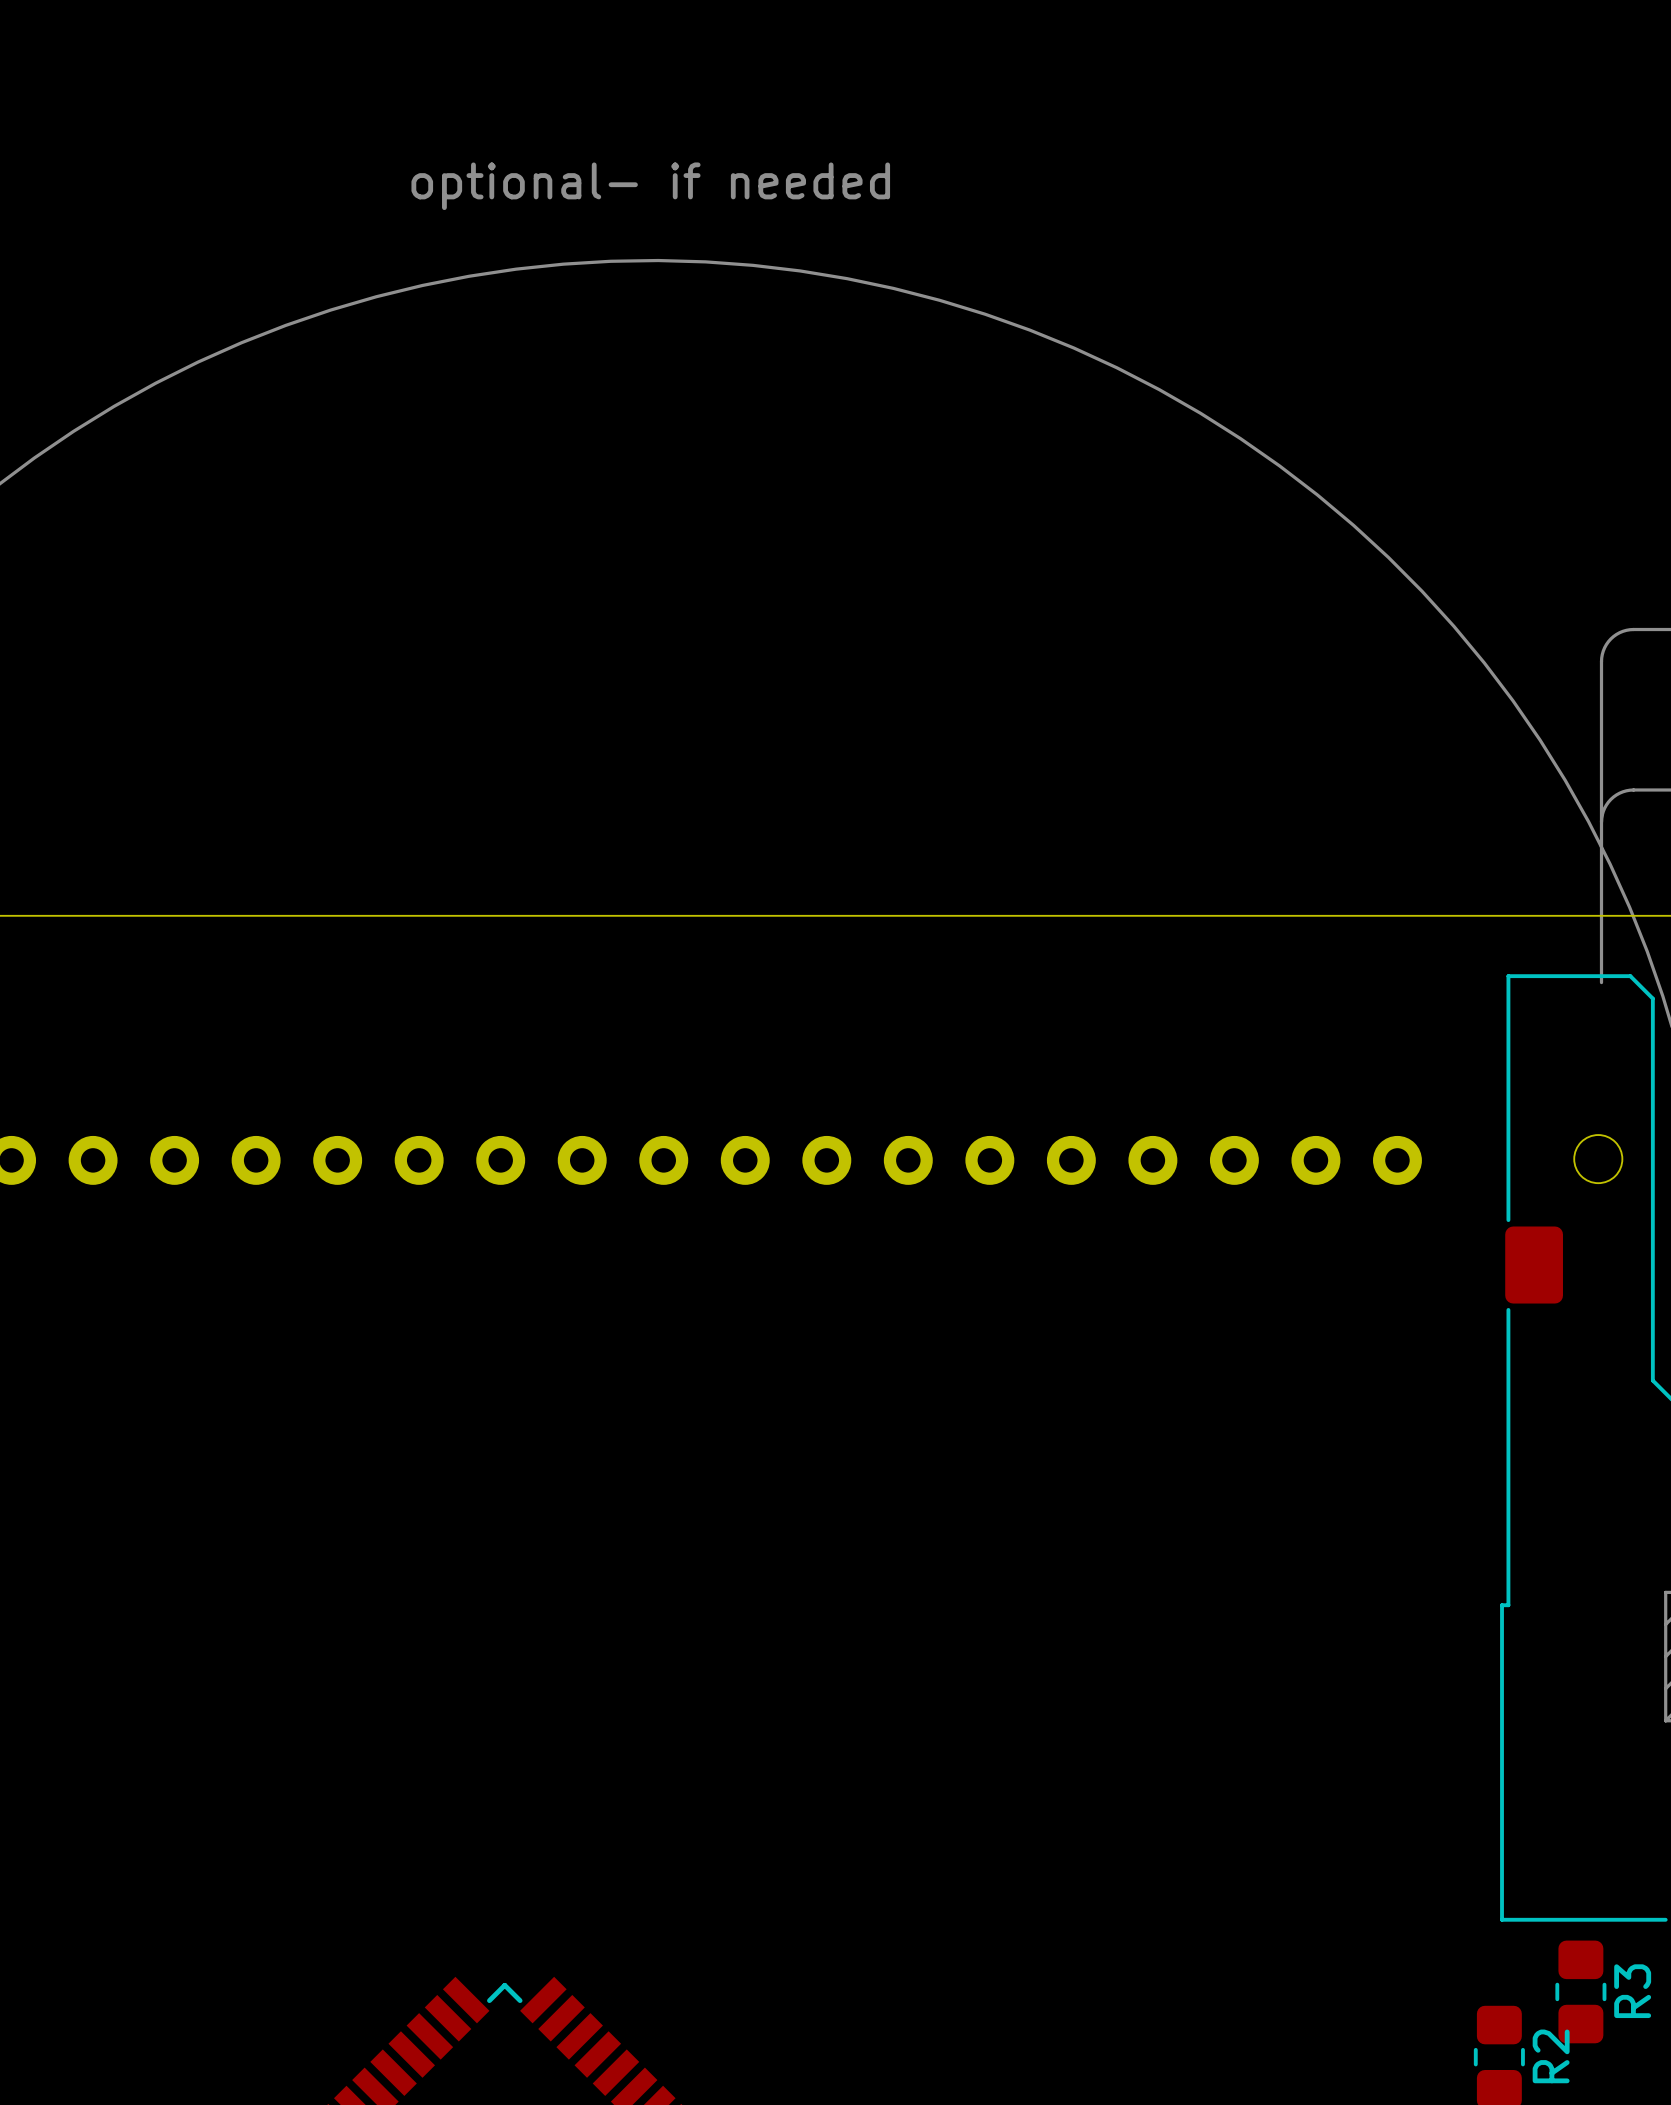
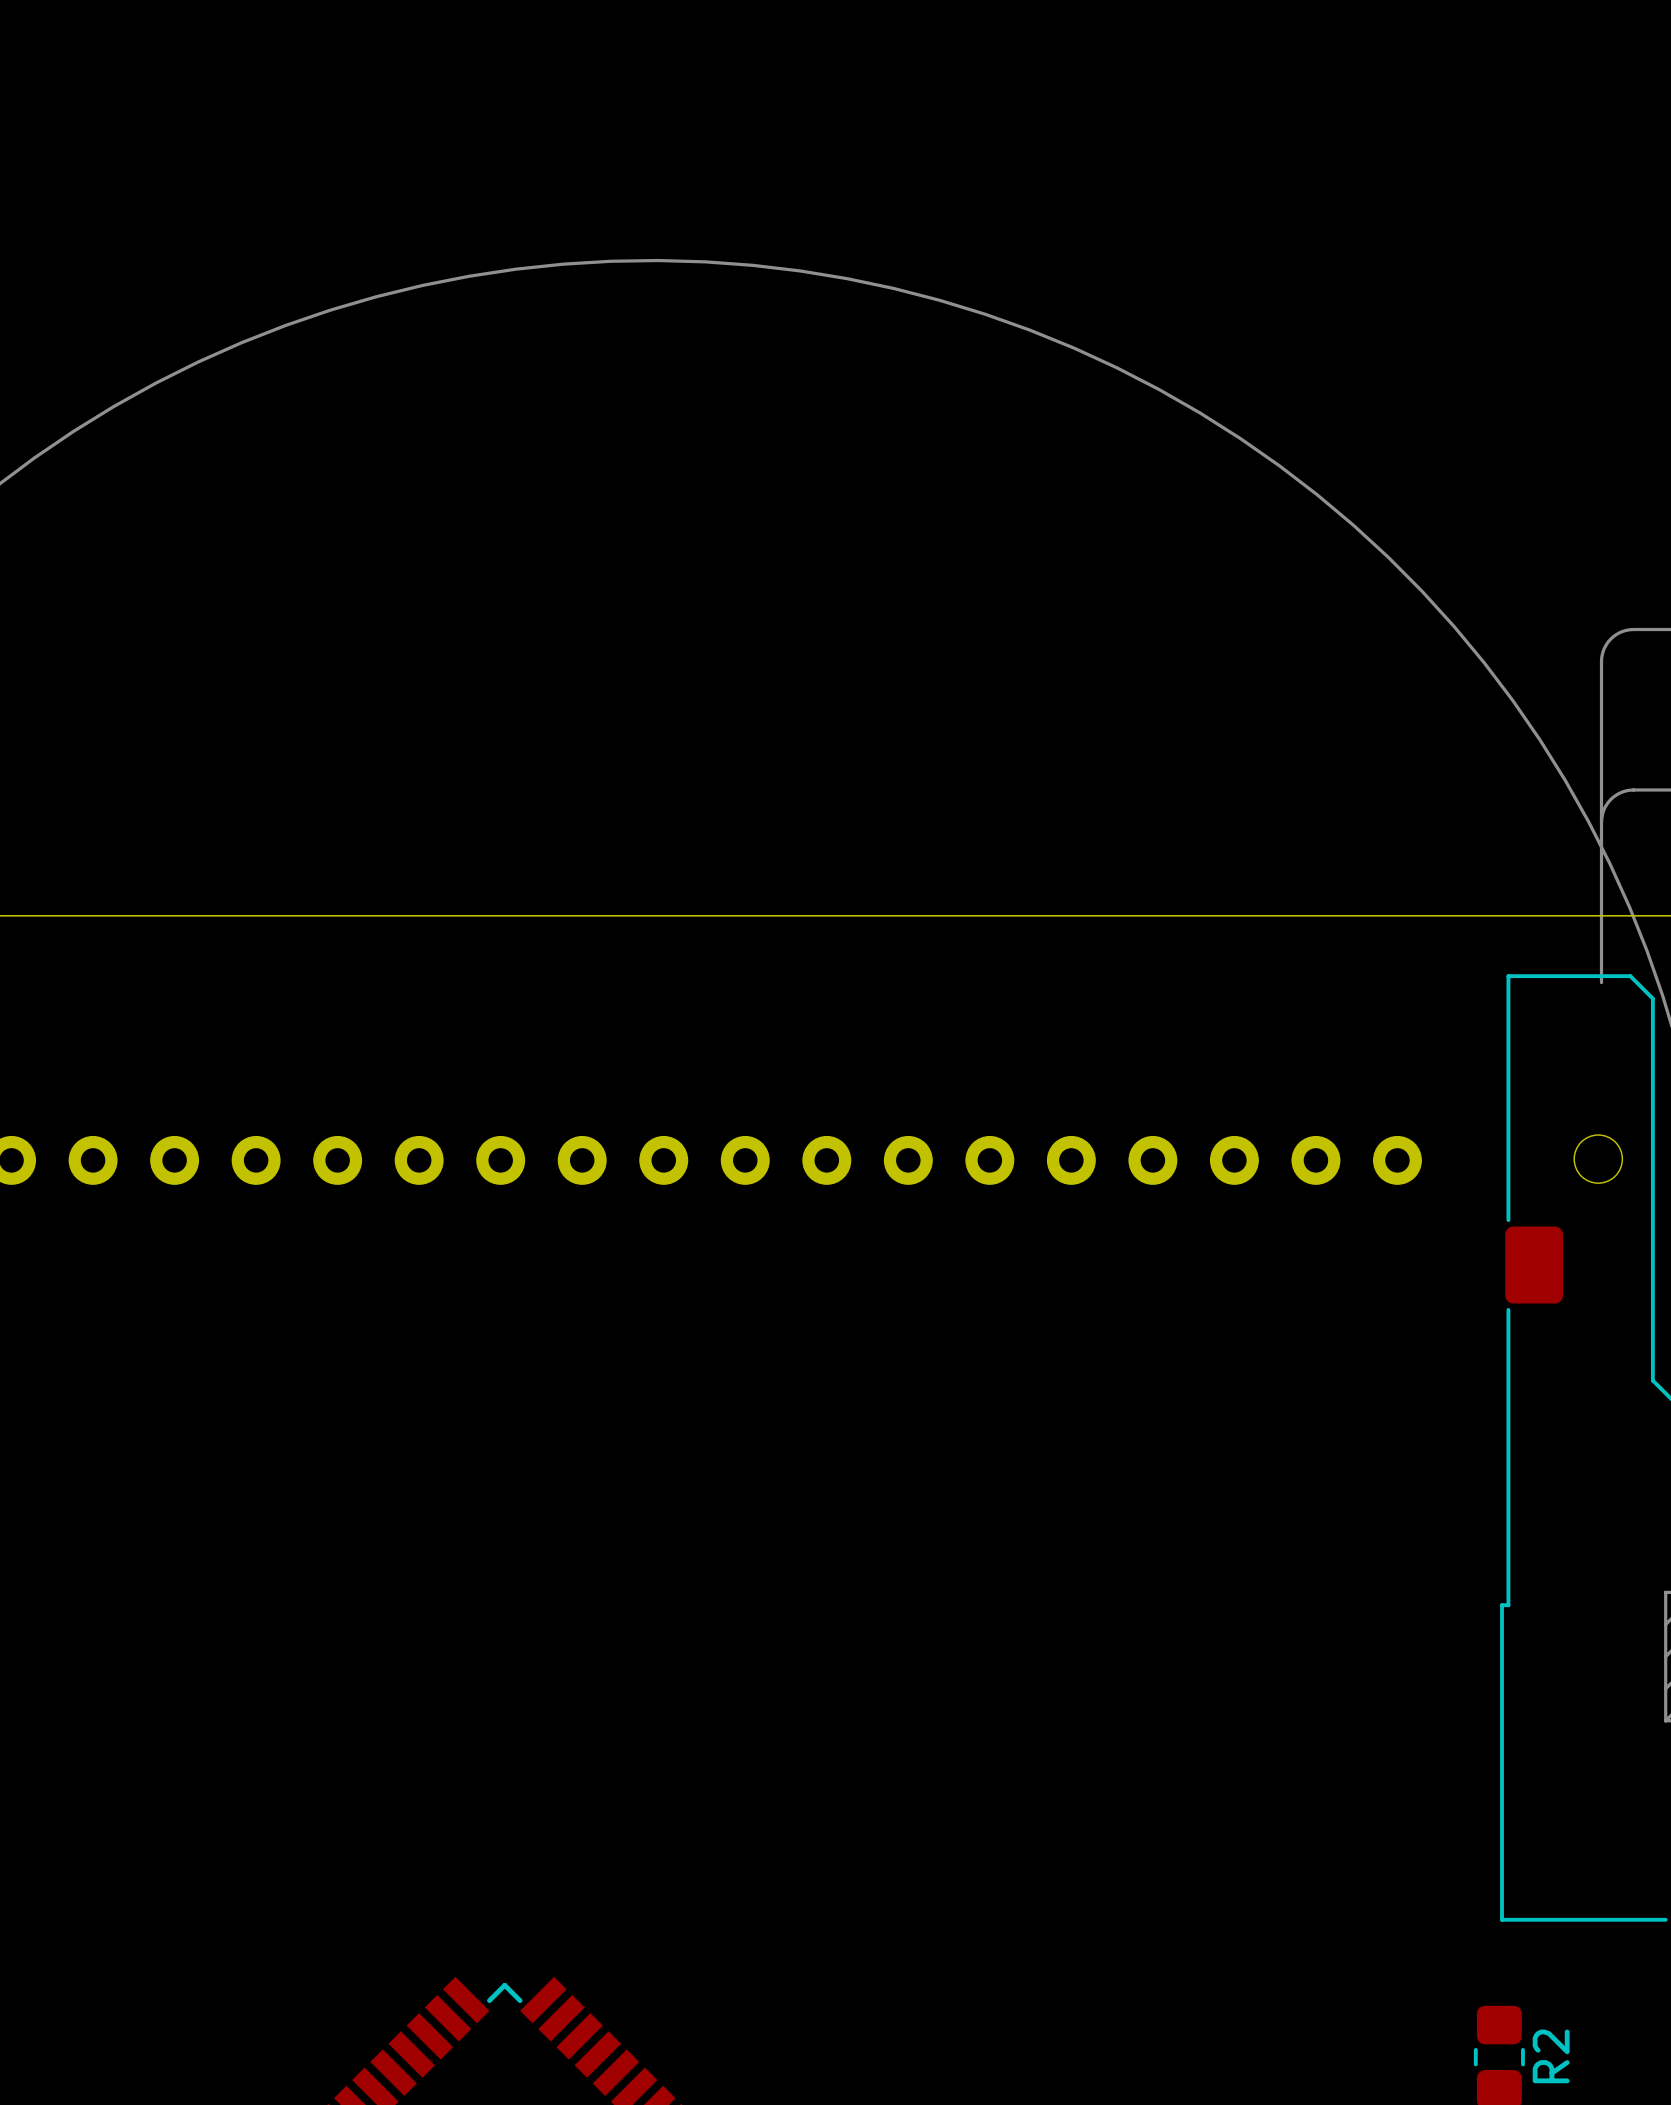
text: optional- if needed (650, 186) -> none
R3: (1580, 1991) -> none

